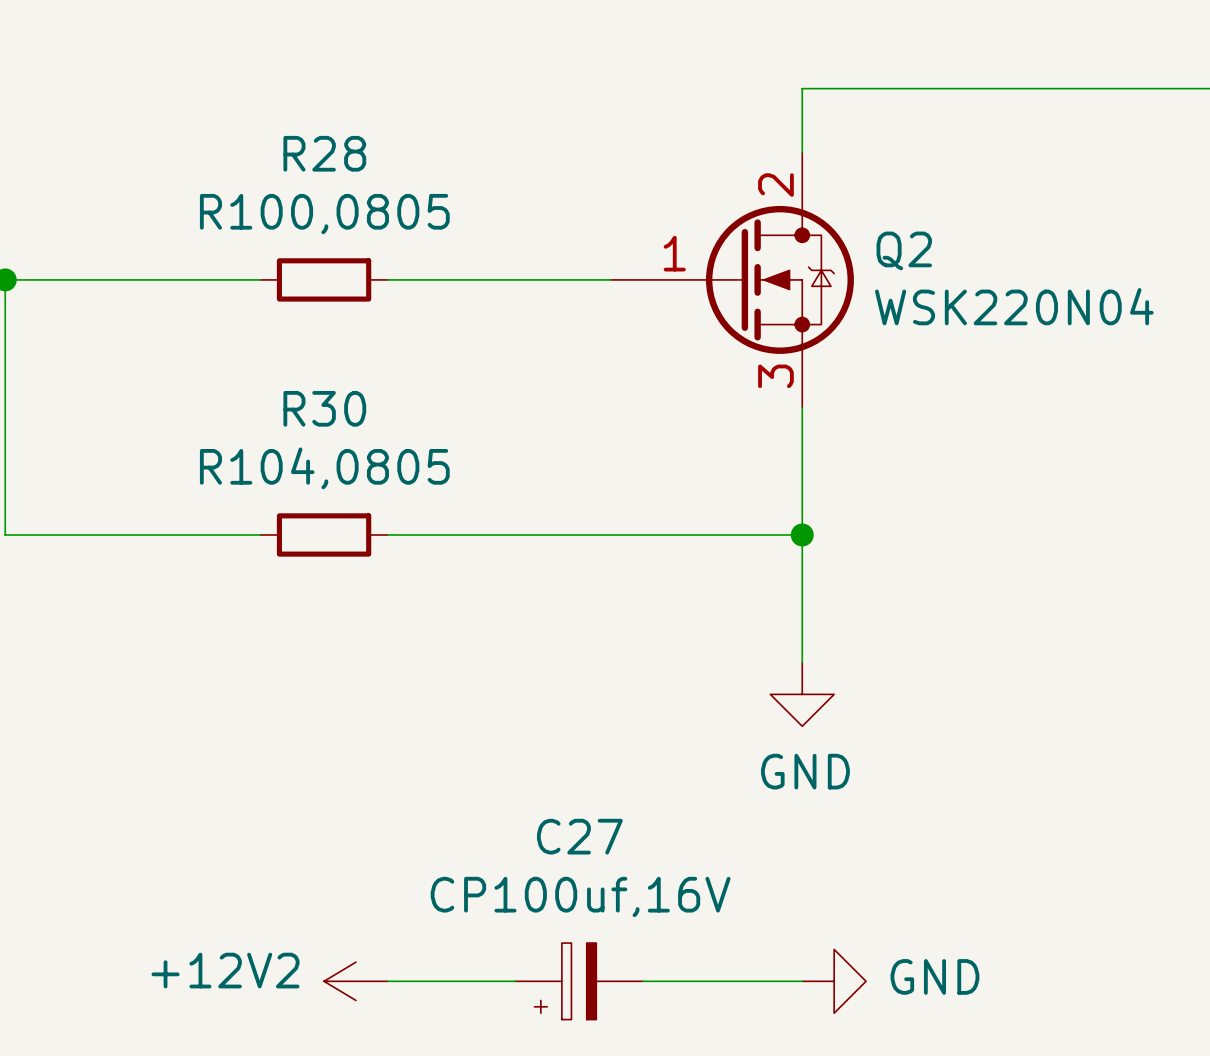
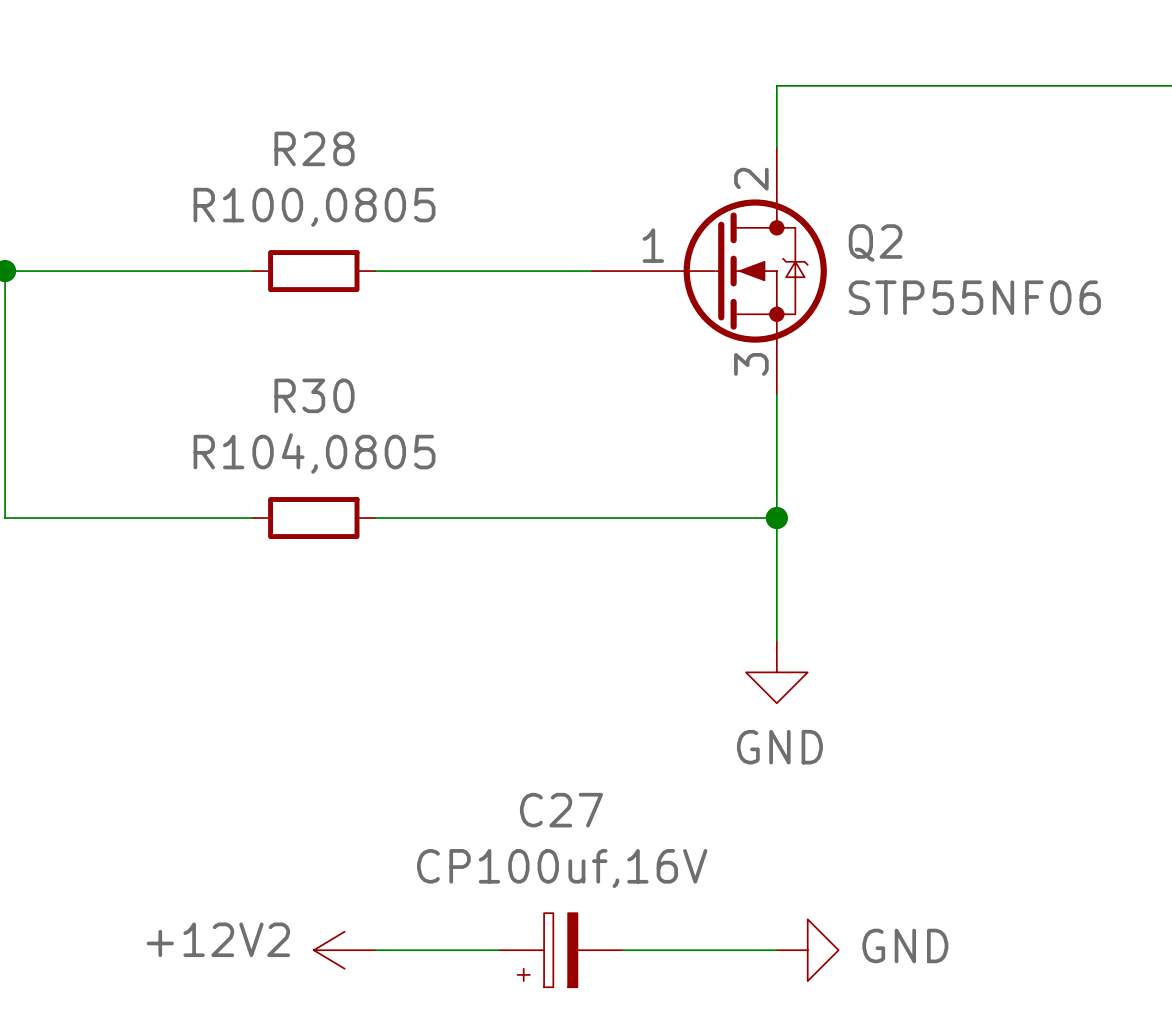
Q2 value: WSK220N04 (1014, 306) -> STP55NF06 (974, 297)

